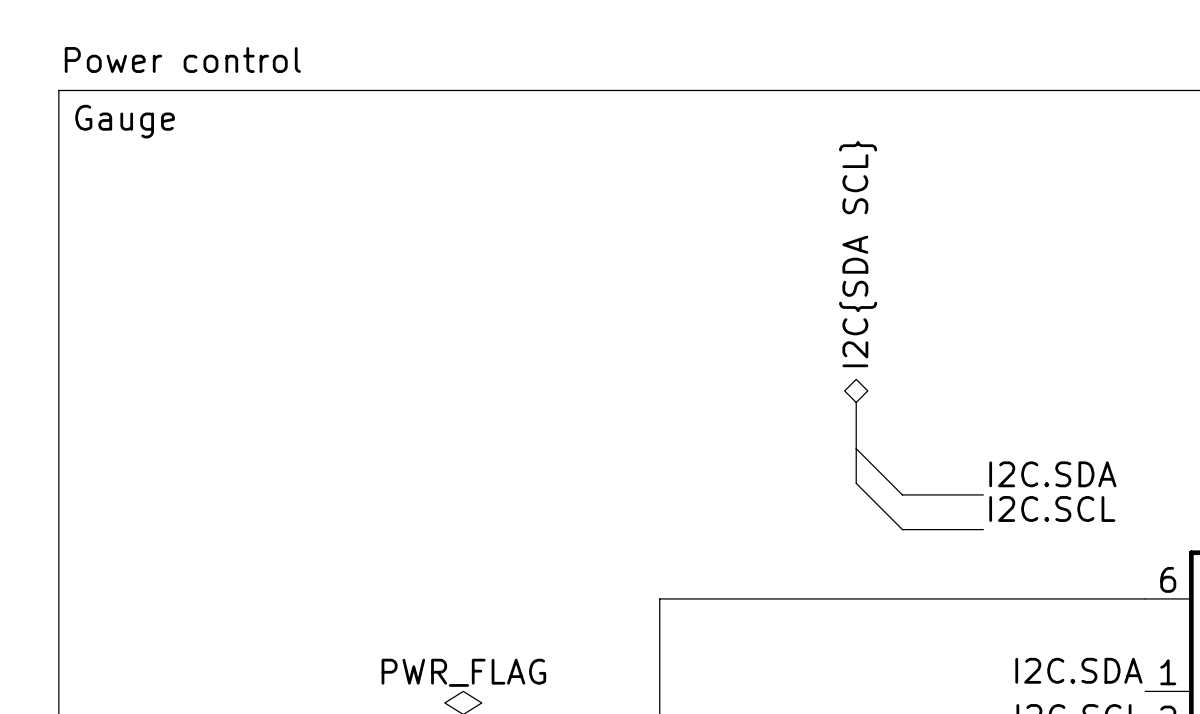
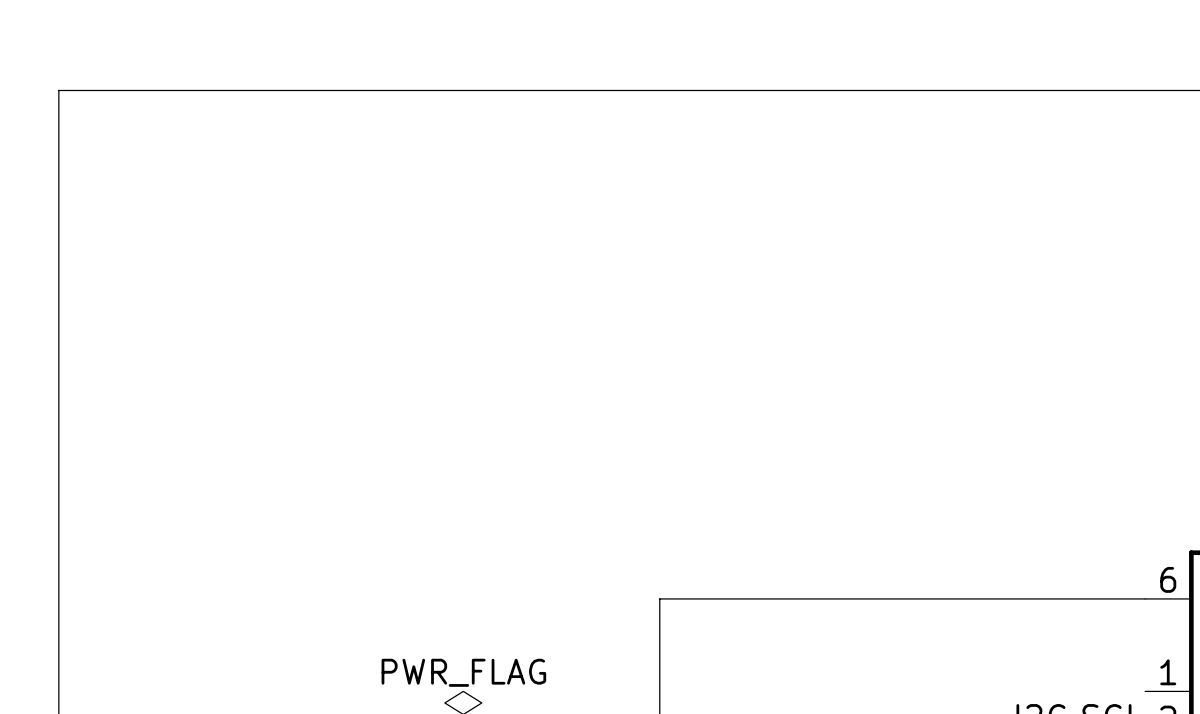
text: Power control (182, 59) -> none
text: Gauge (125, 121) -> none
hierarchical label: I2C{SDA SCL} (858, 254) -> none
bus: (856, 402) (856, 483) -> none
wire: (856, 448) (902, 494) (983, 494) -> none
label: I2C.SDA (1052, 474) -> none
wire: (856, 483) (902, 529) (983, 529) -> none
label: I2C.SCL (1052, 508) -> none
label: I2C.SDA (1078, 670) -> none

